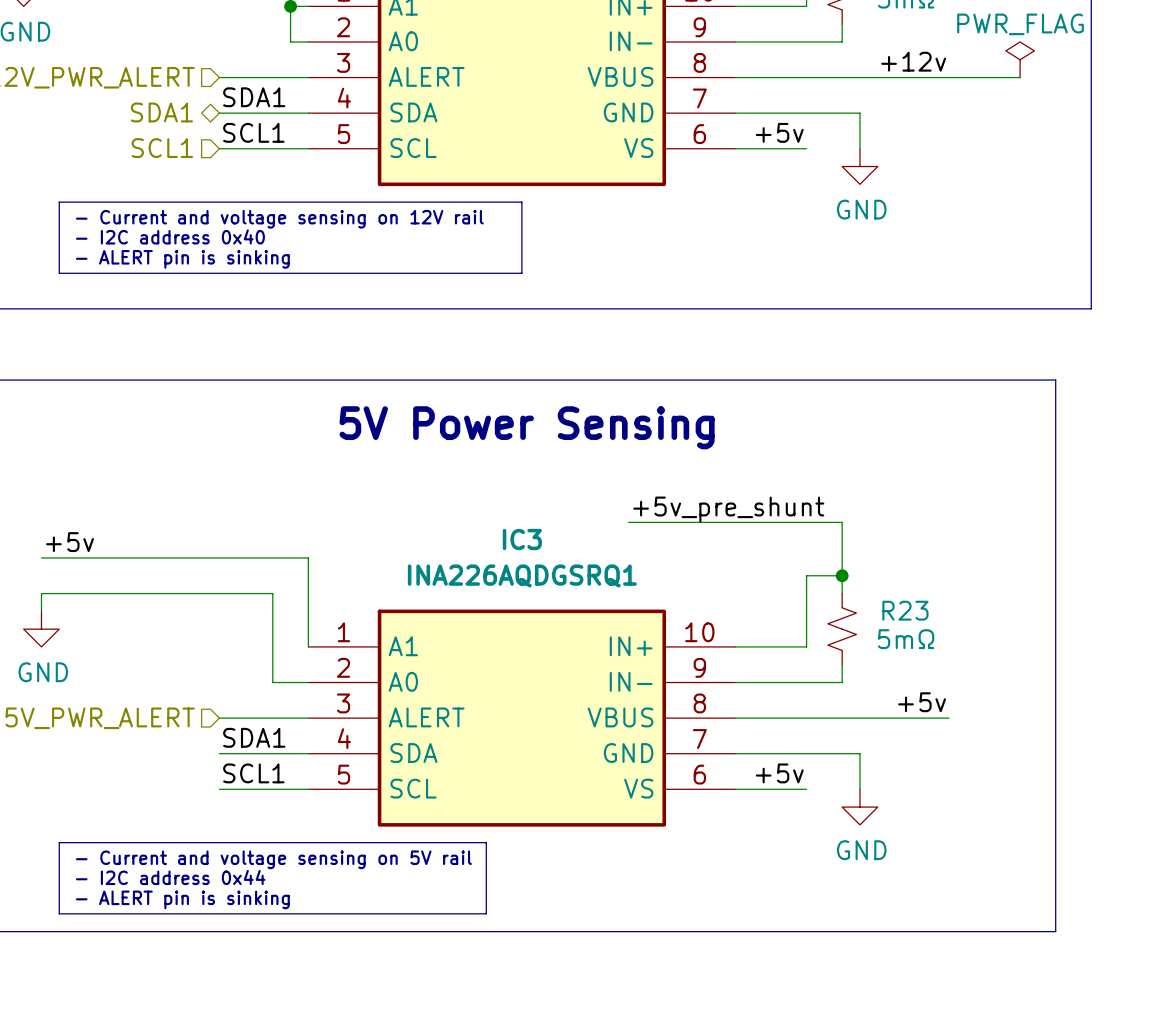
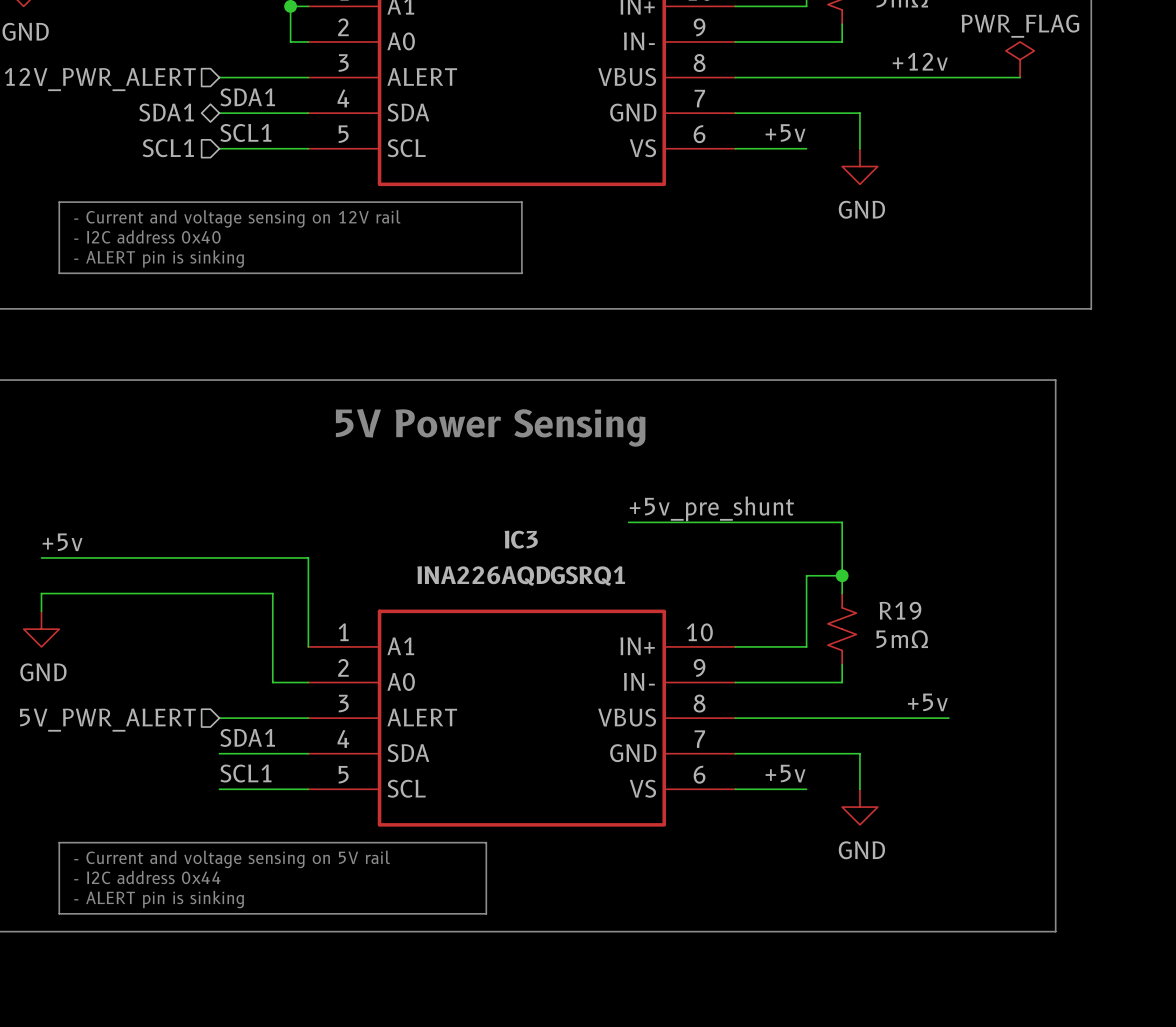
R23 name: R23 (905, 610) -> R19 (900, 610)

